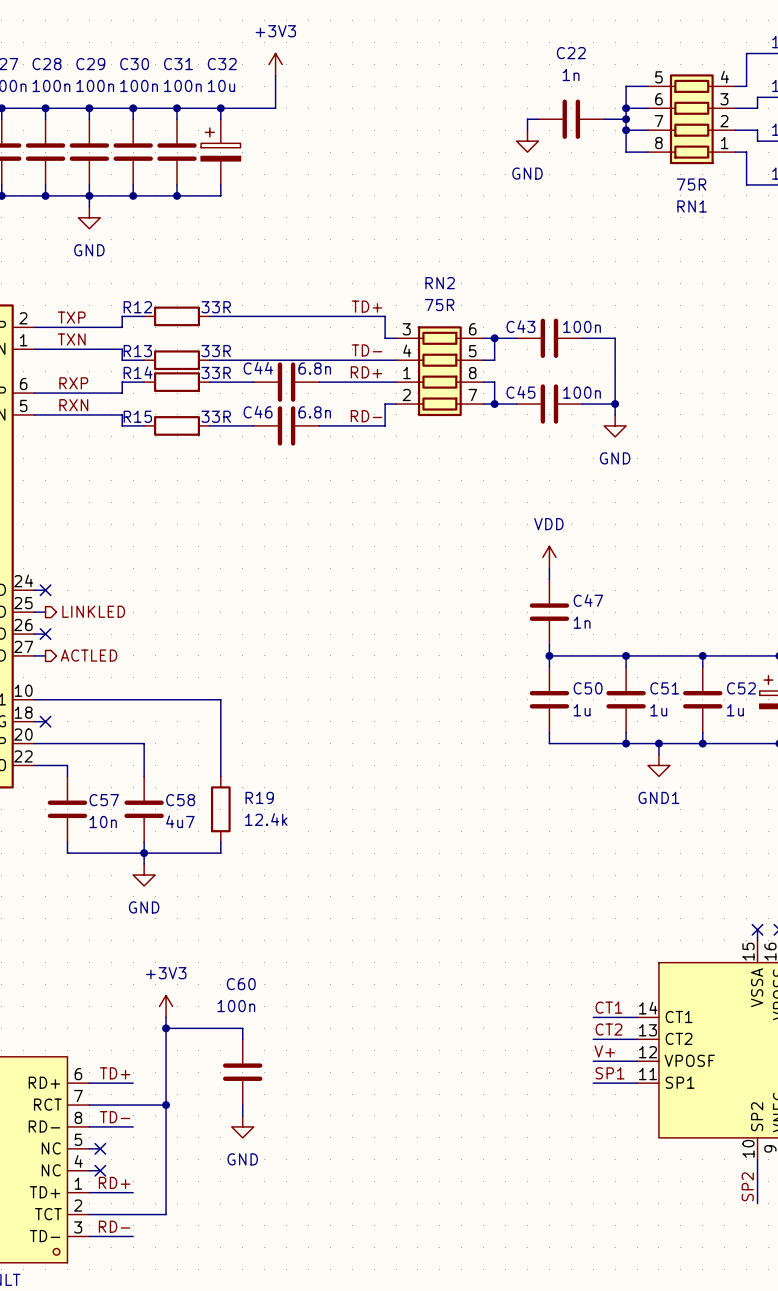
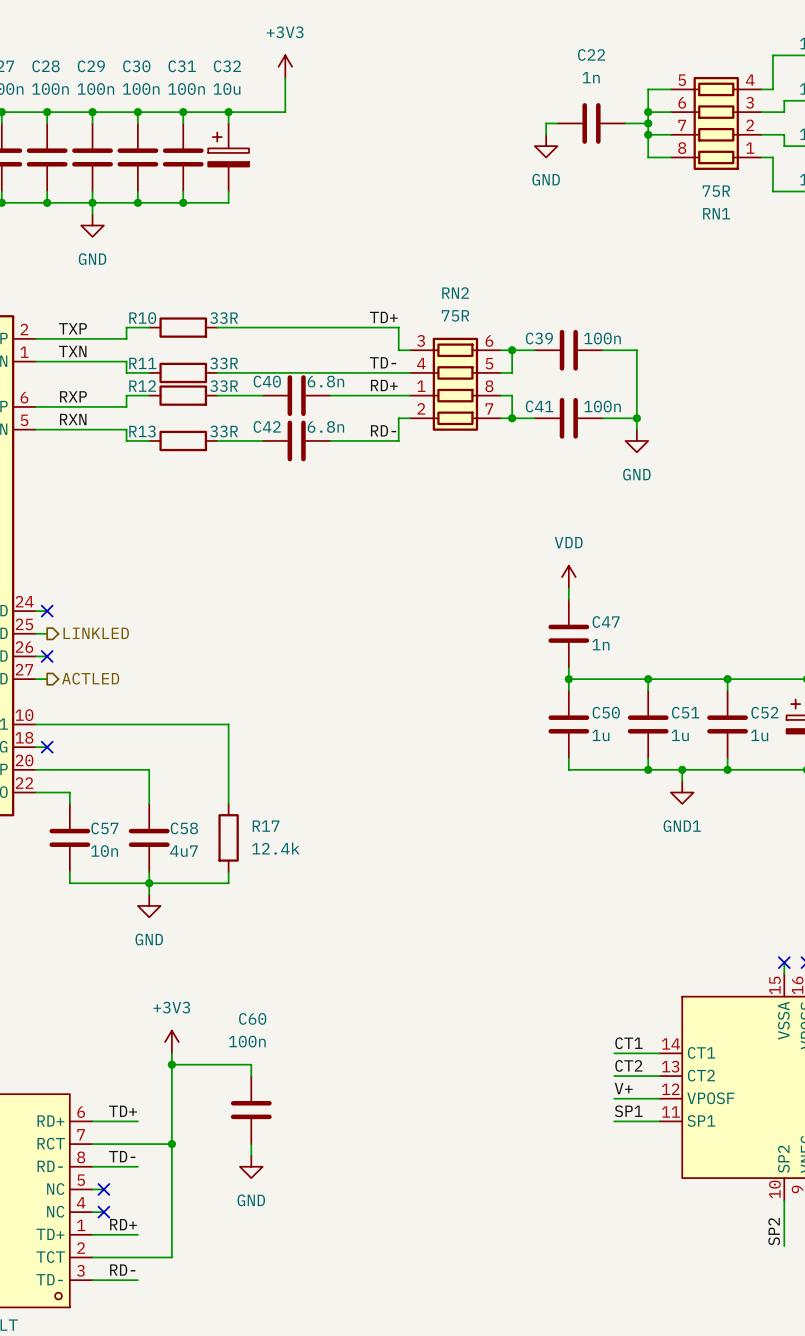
R12 name: R12 (137, 307) -> R10 (142, 318)
C43 name: C43 (520, 326) -> C39 (539, 338)
R13 name: R13 (137, 351) -> R11 (142, 363)
C44 name: C44 (258, 368) -> C40 (267, 381)
R14 name: R14 (138, 372) -> R12 (142, 386)
C45 name: C45 (520, 392) -> C41 (539, 406)
C46 name: C46 (258, 412) -> C42 (267, 426)
R15 name: R15 (137, 416) -> R13 (142, 431)
R19 name: R19 (259, 797) -> R17 (266, 826)

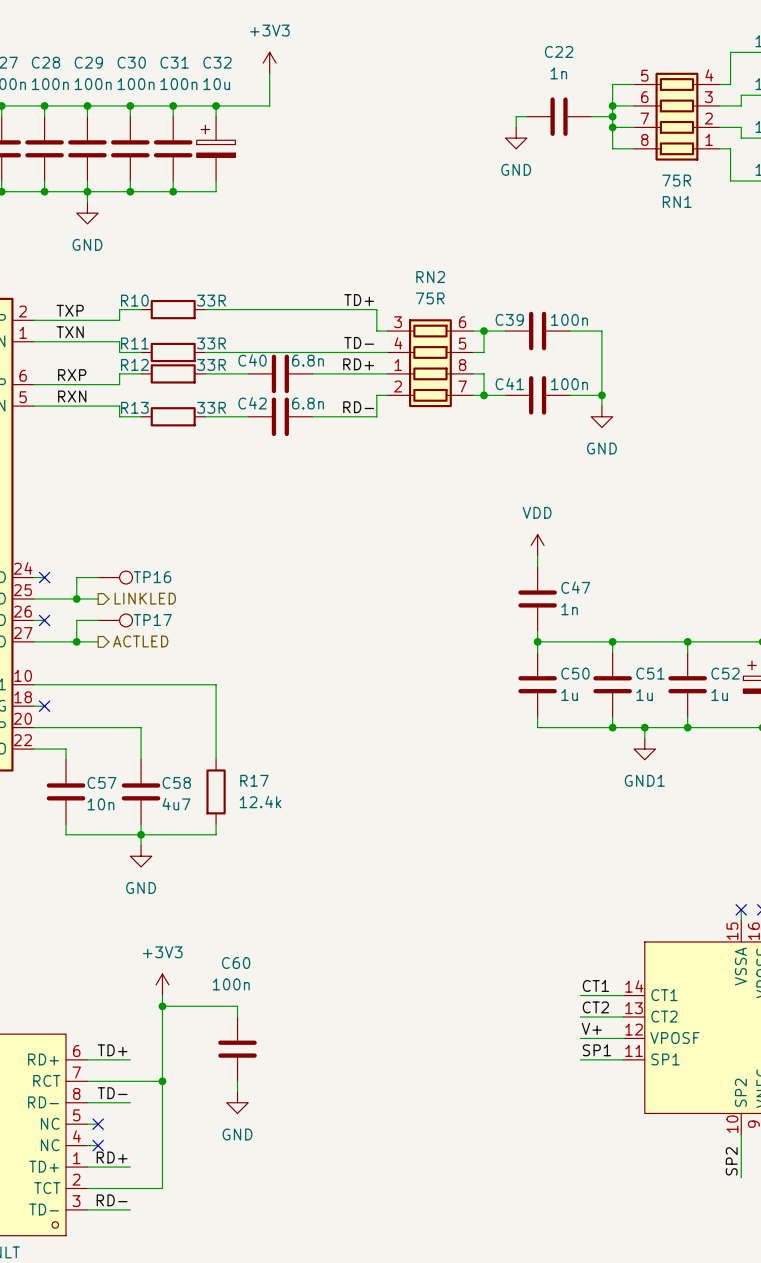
wire: none -> (98, 577) (76, 577) (76, 598)
TP16: none -> (115, 577)
wire: none -> (44, 598) (98, 598)
junction: none -> (76, 598)
hierarchical label position: LINKLED (96, 633) -> LINKLED (145, 598)
wire: none -> (98, 620) (76, 620) (76, 641)
TP17: none -> (115, 620)
hierarchical label position: ACTLED (90, 678) -> ACTLED (140, 641)
wire: none -> (44, 641) (98, 641)
junction: none -> (76, 641)

